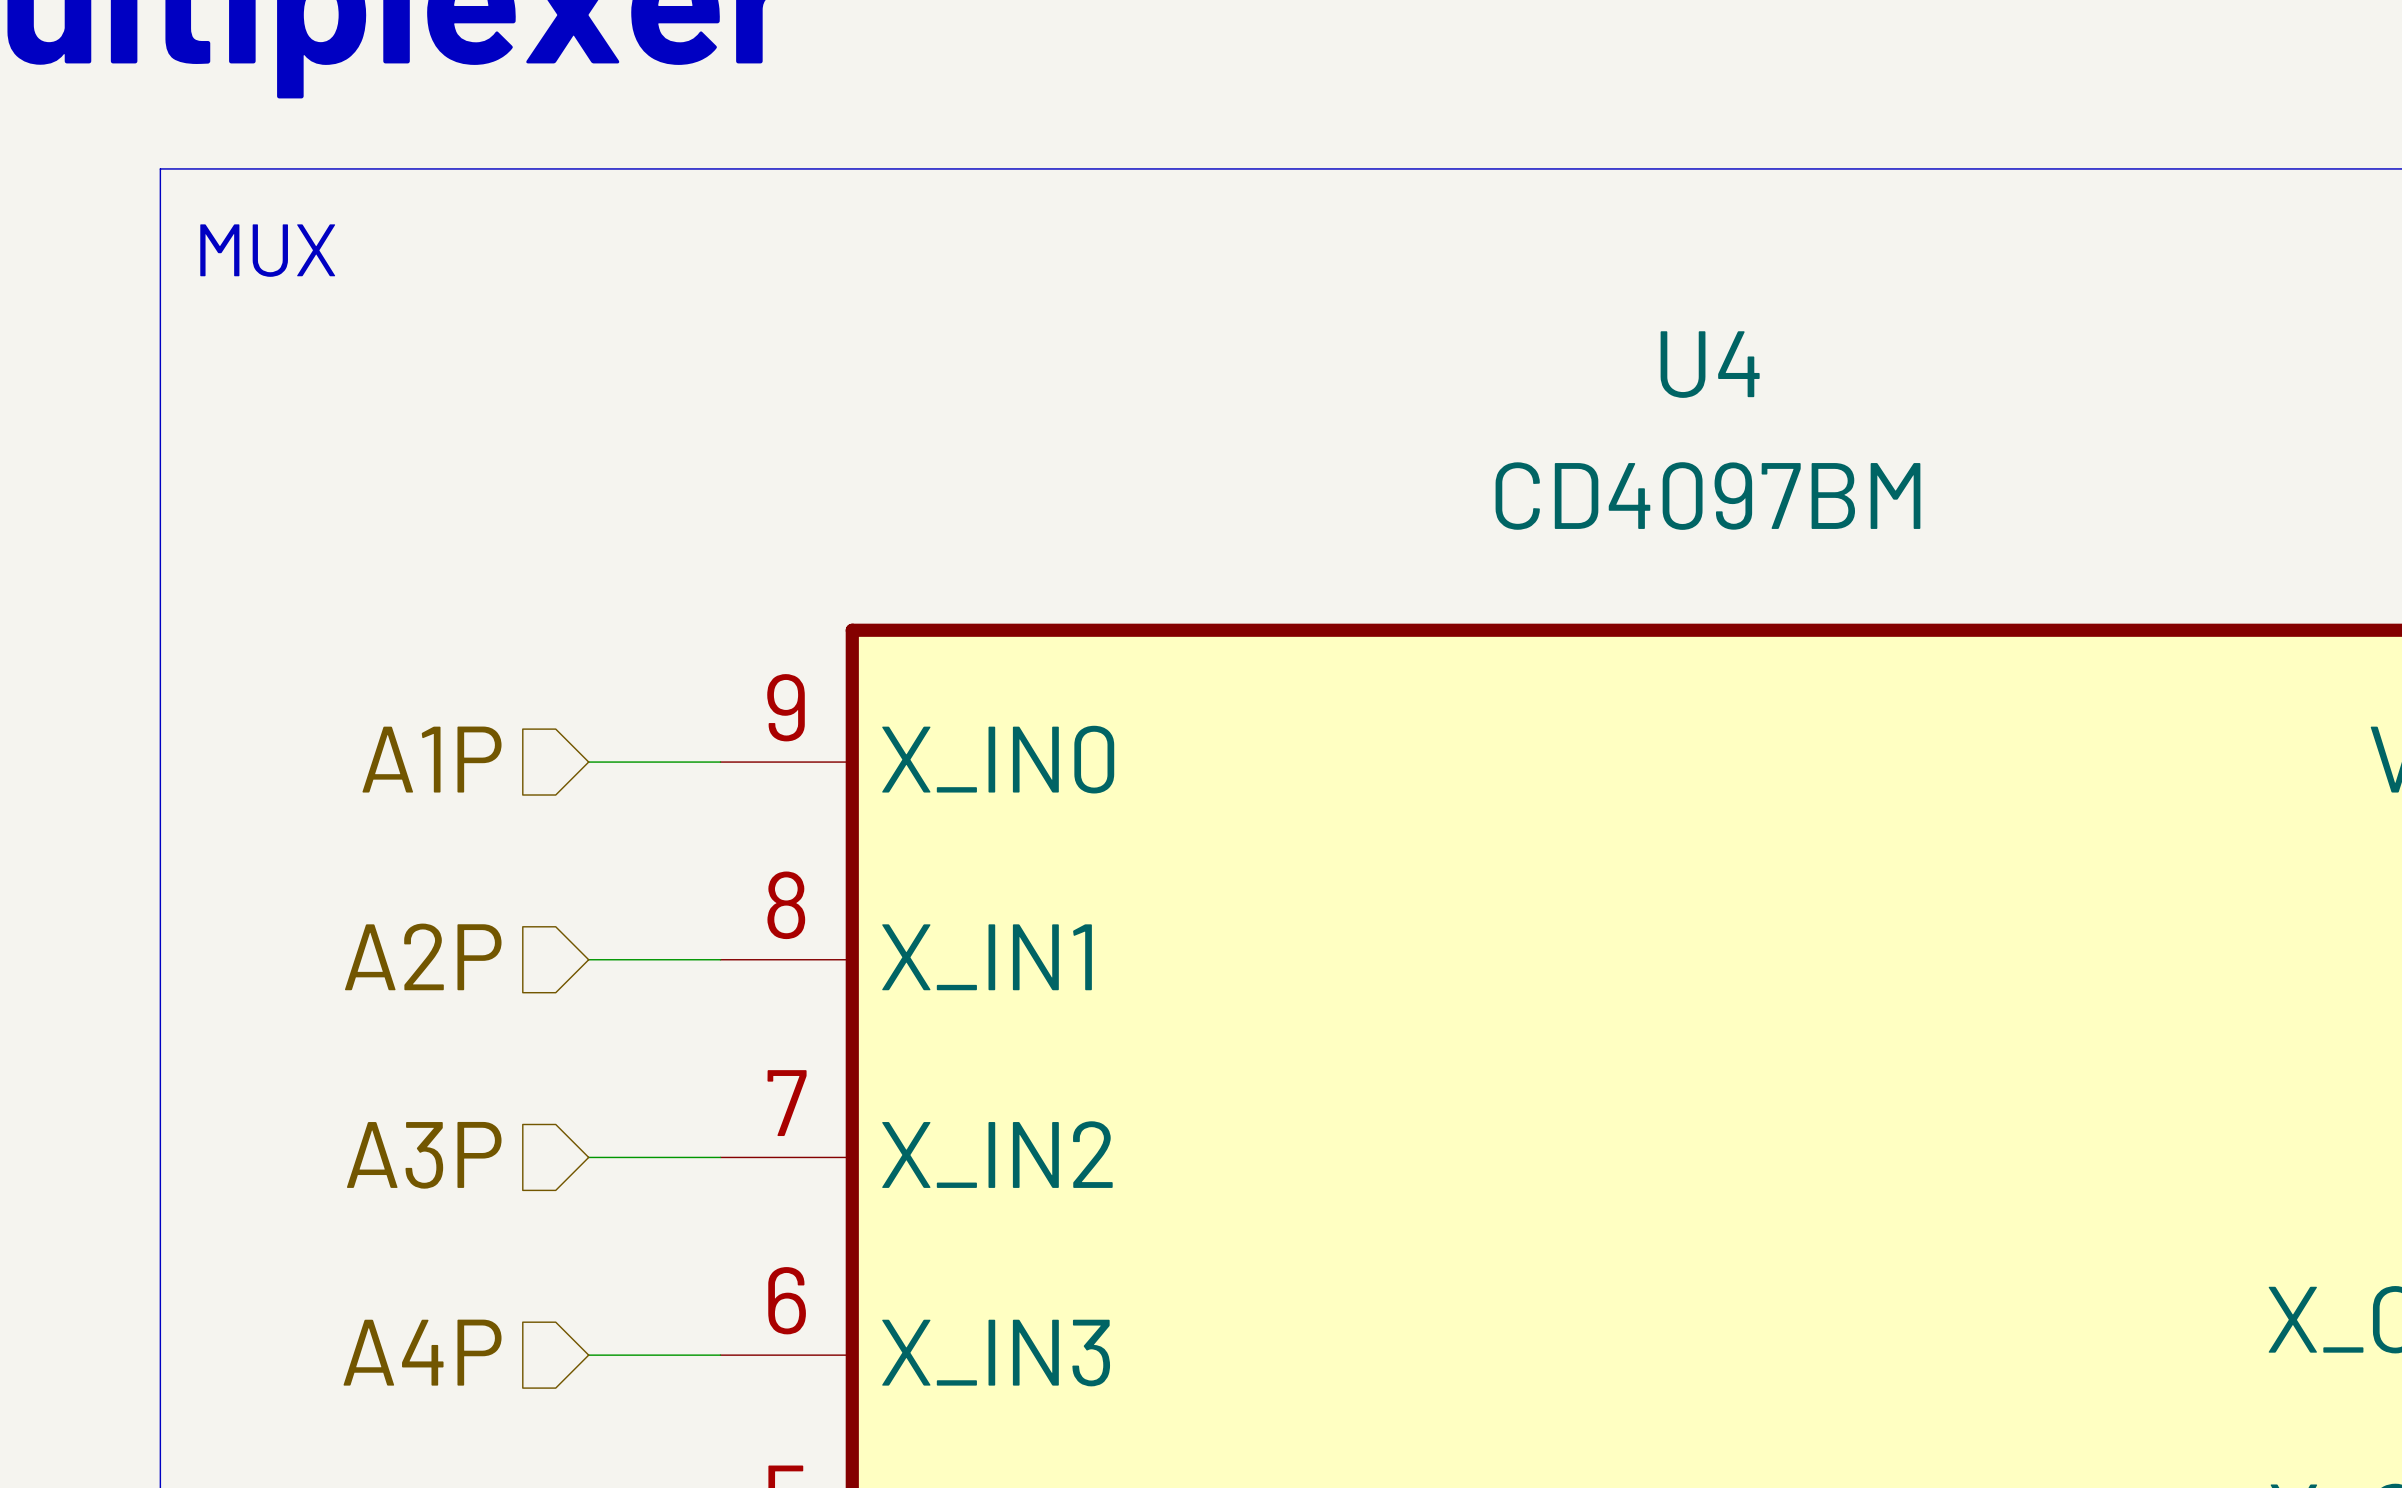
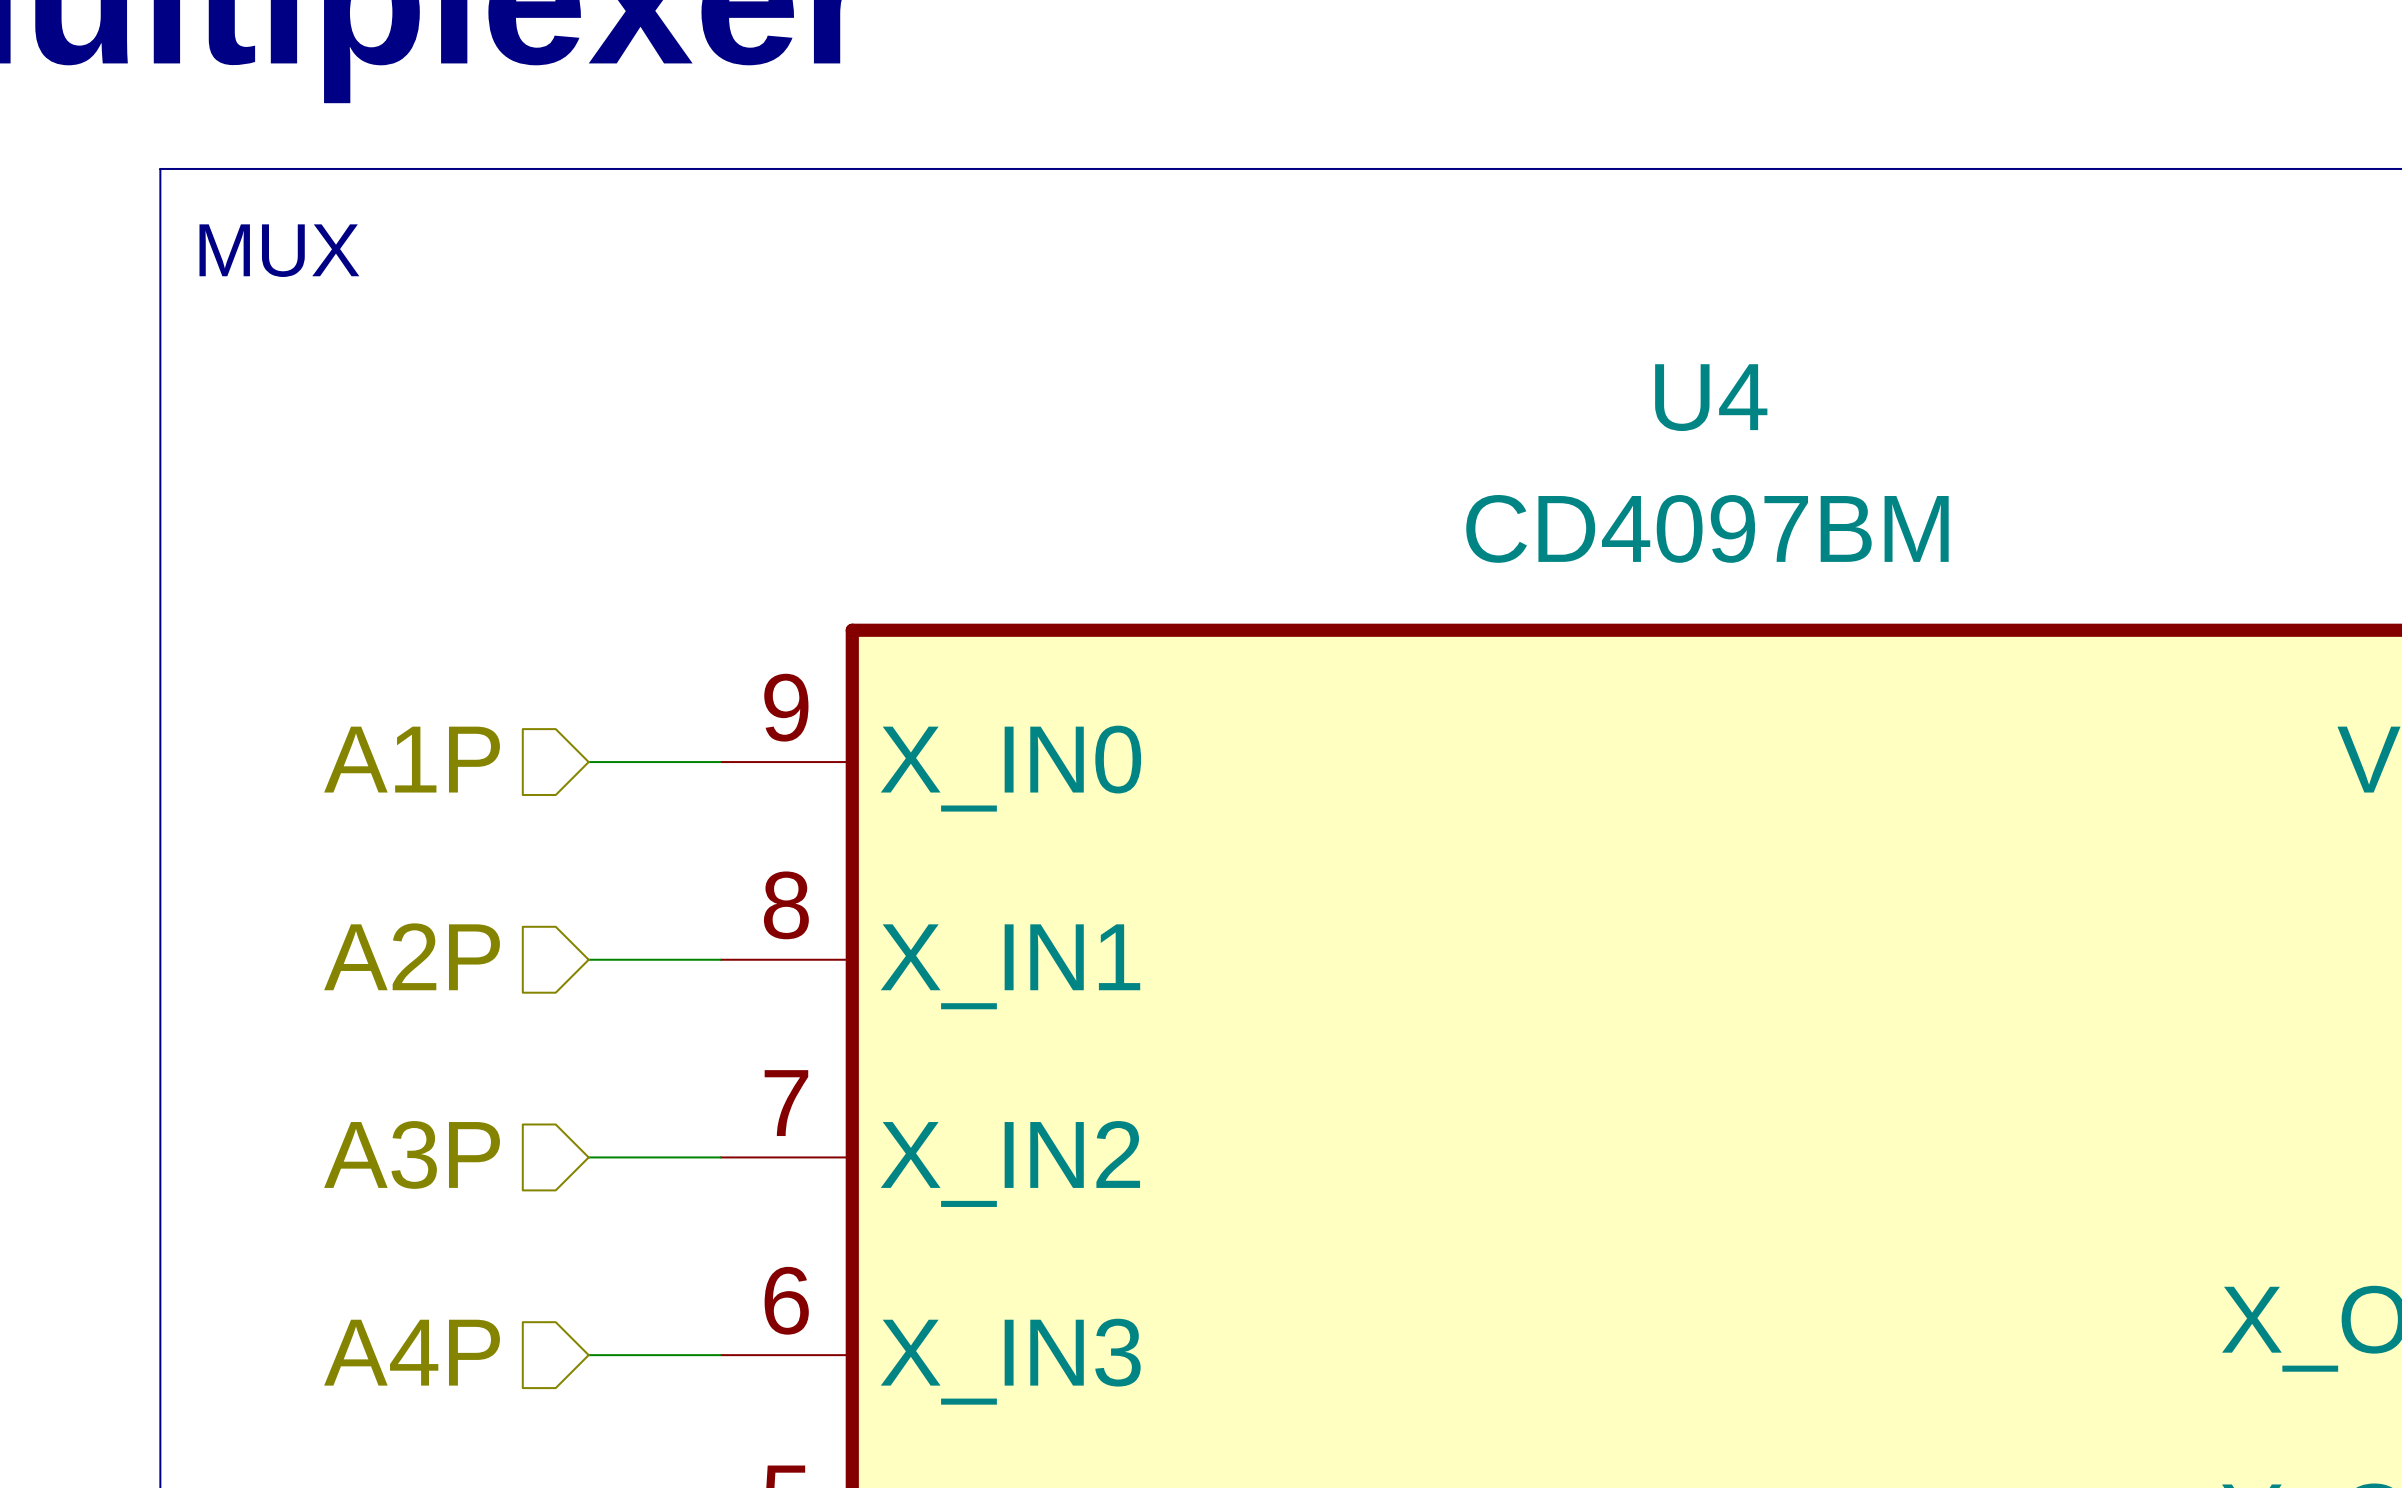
U4 name position: U4 (1710, 364) -> U4 (1711, 397)
U4 value position: CD4097BM (1707, 496) -> CD4097BM (1707, 528)

